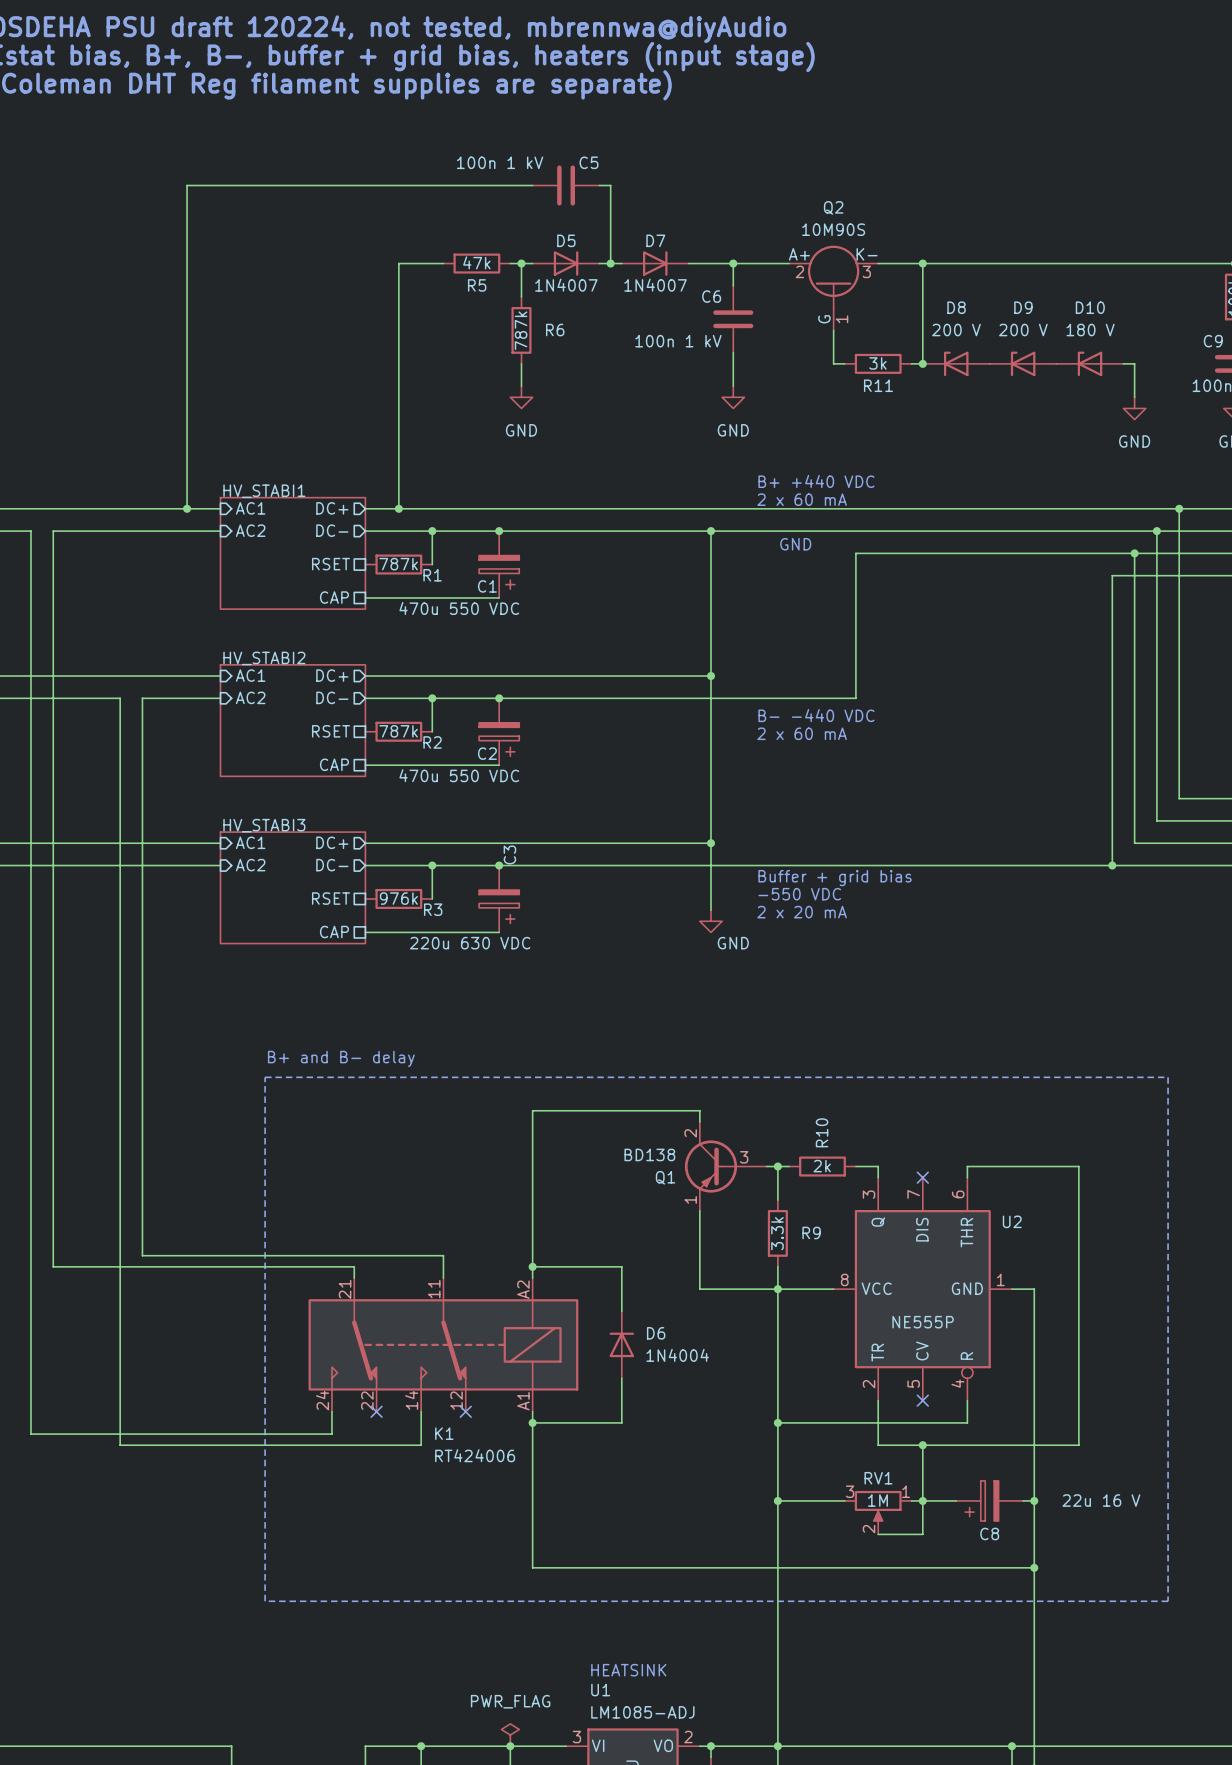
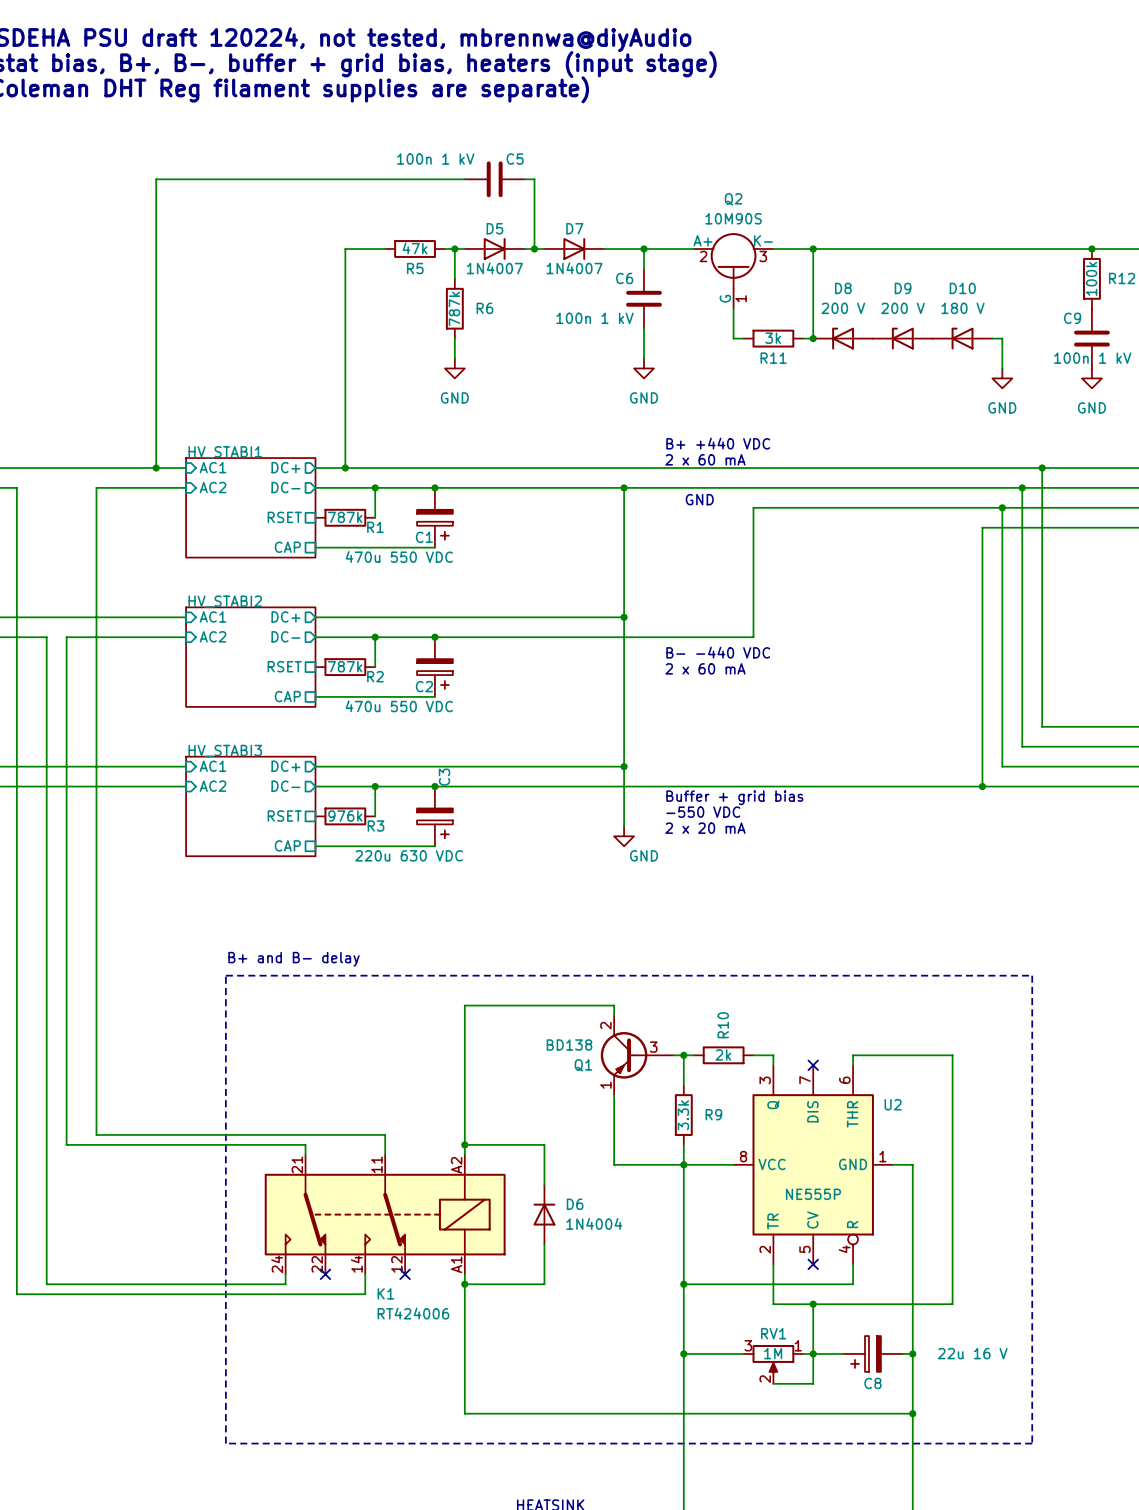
wire: (120, 531) (53, 531) (53, 1266) (86, 1266) -> (66, 637) (66, 1144)
wire: (64, 698) (86, 698) -> (46, 637) (46, 1284) (285, 1284)
wire: (142, 698) (142, 1255) -> (116, 637) (96, 637) (96, 487)
wire: (120, 1255) (120, 1445) (421, 1445) (421, 1434) -> (96, 1134) (116, 1134)
wire: (331, 1422) (331, 1434) -> (365, 1294) (285, 1294)

